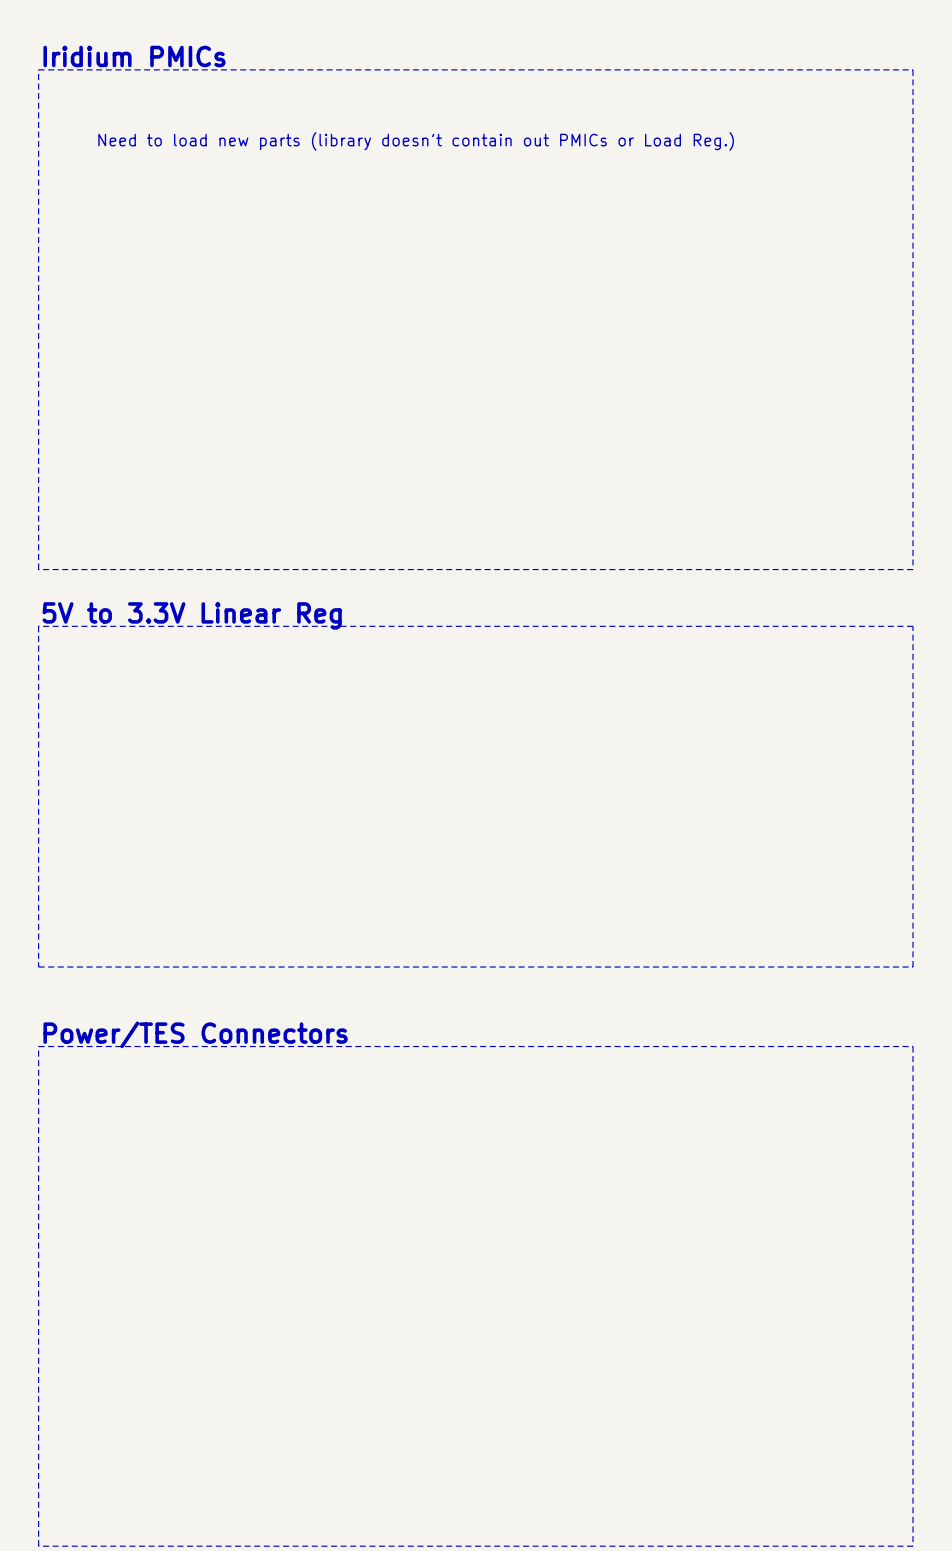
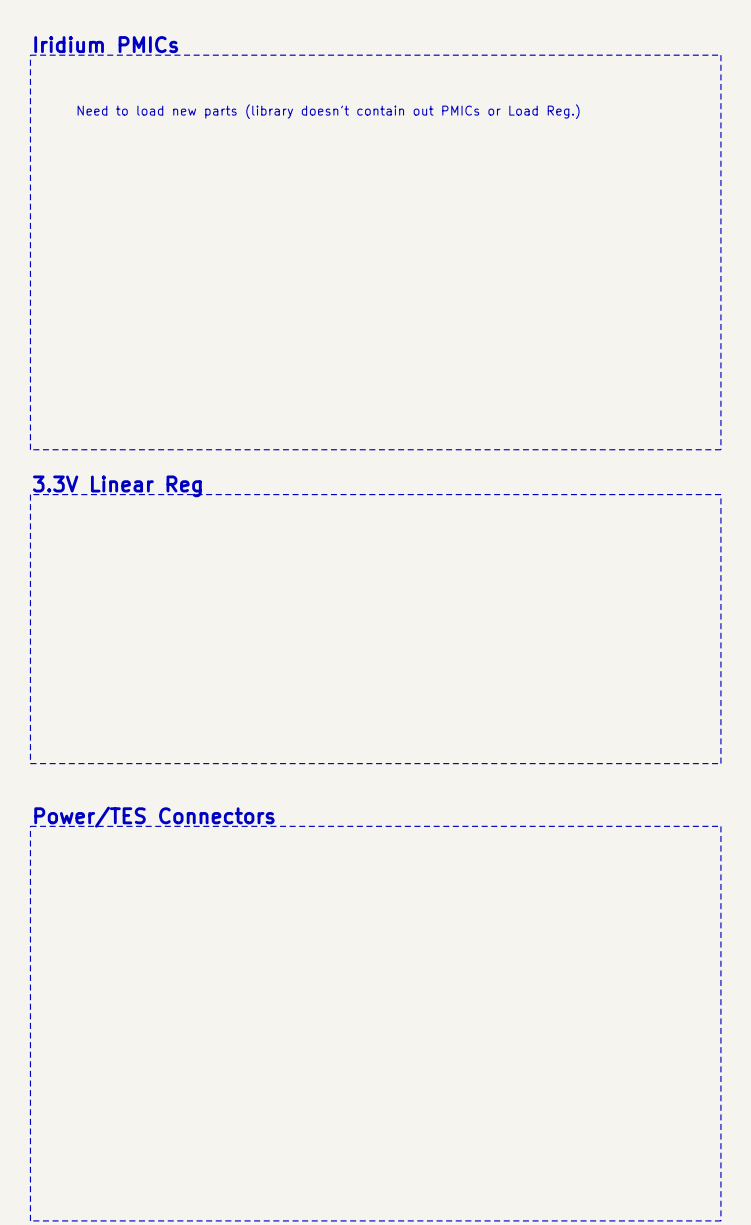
text: 5V to 3.3V Linear Reg (192, 615) -> 3.3V Linear Reg (117, 486)

